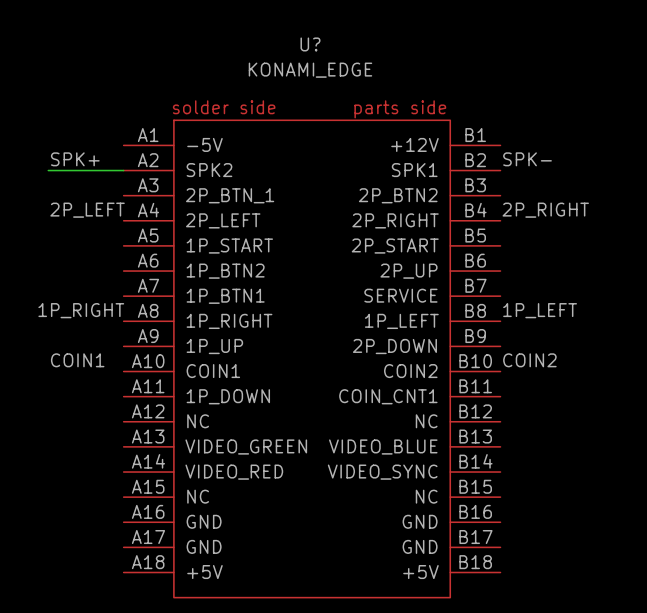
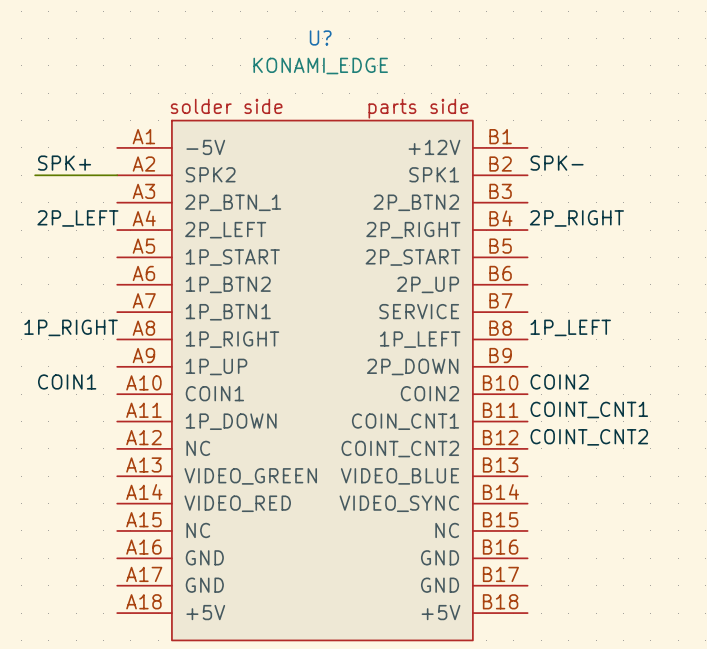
label: none -> COINT_CNT1 (589, 409)
label: none -> COINT_CNT2 (589, 437)
U? pin name: NC (426, 421) -> COINT_CNT2 (400, 449)

